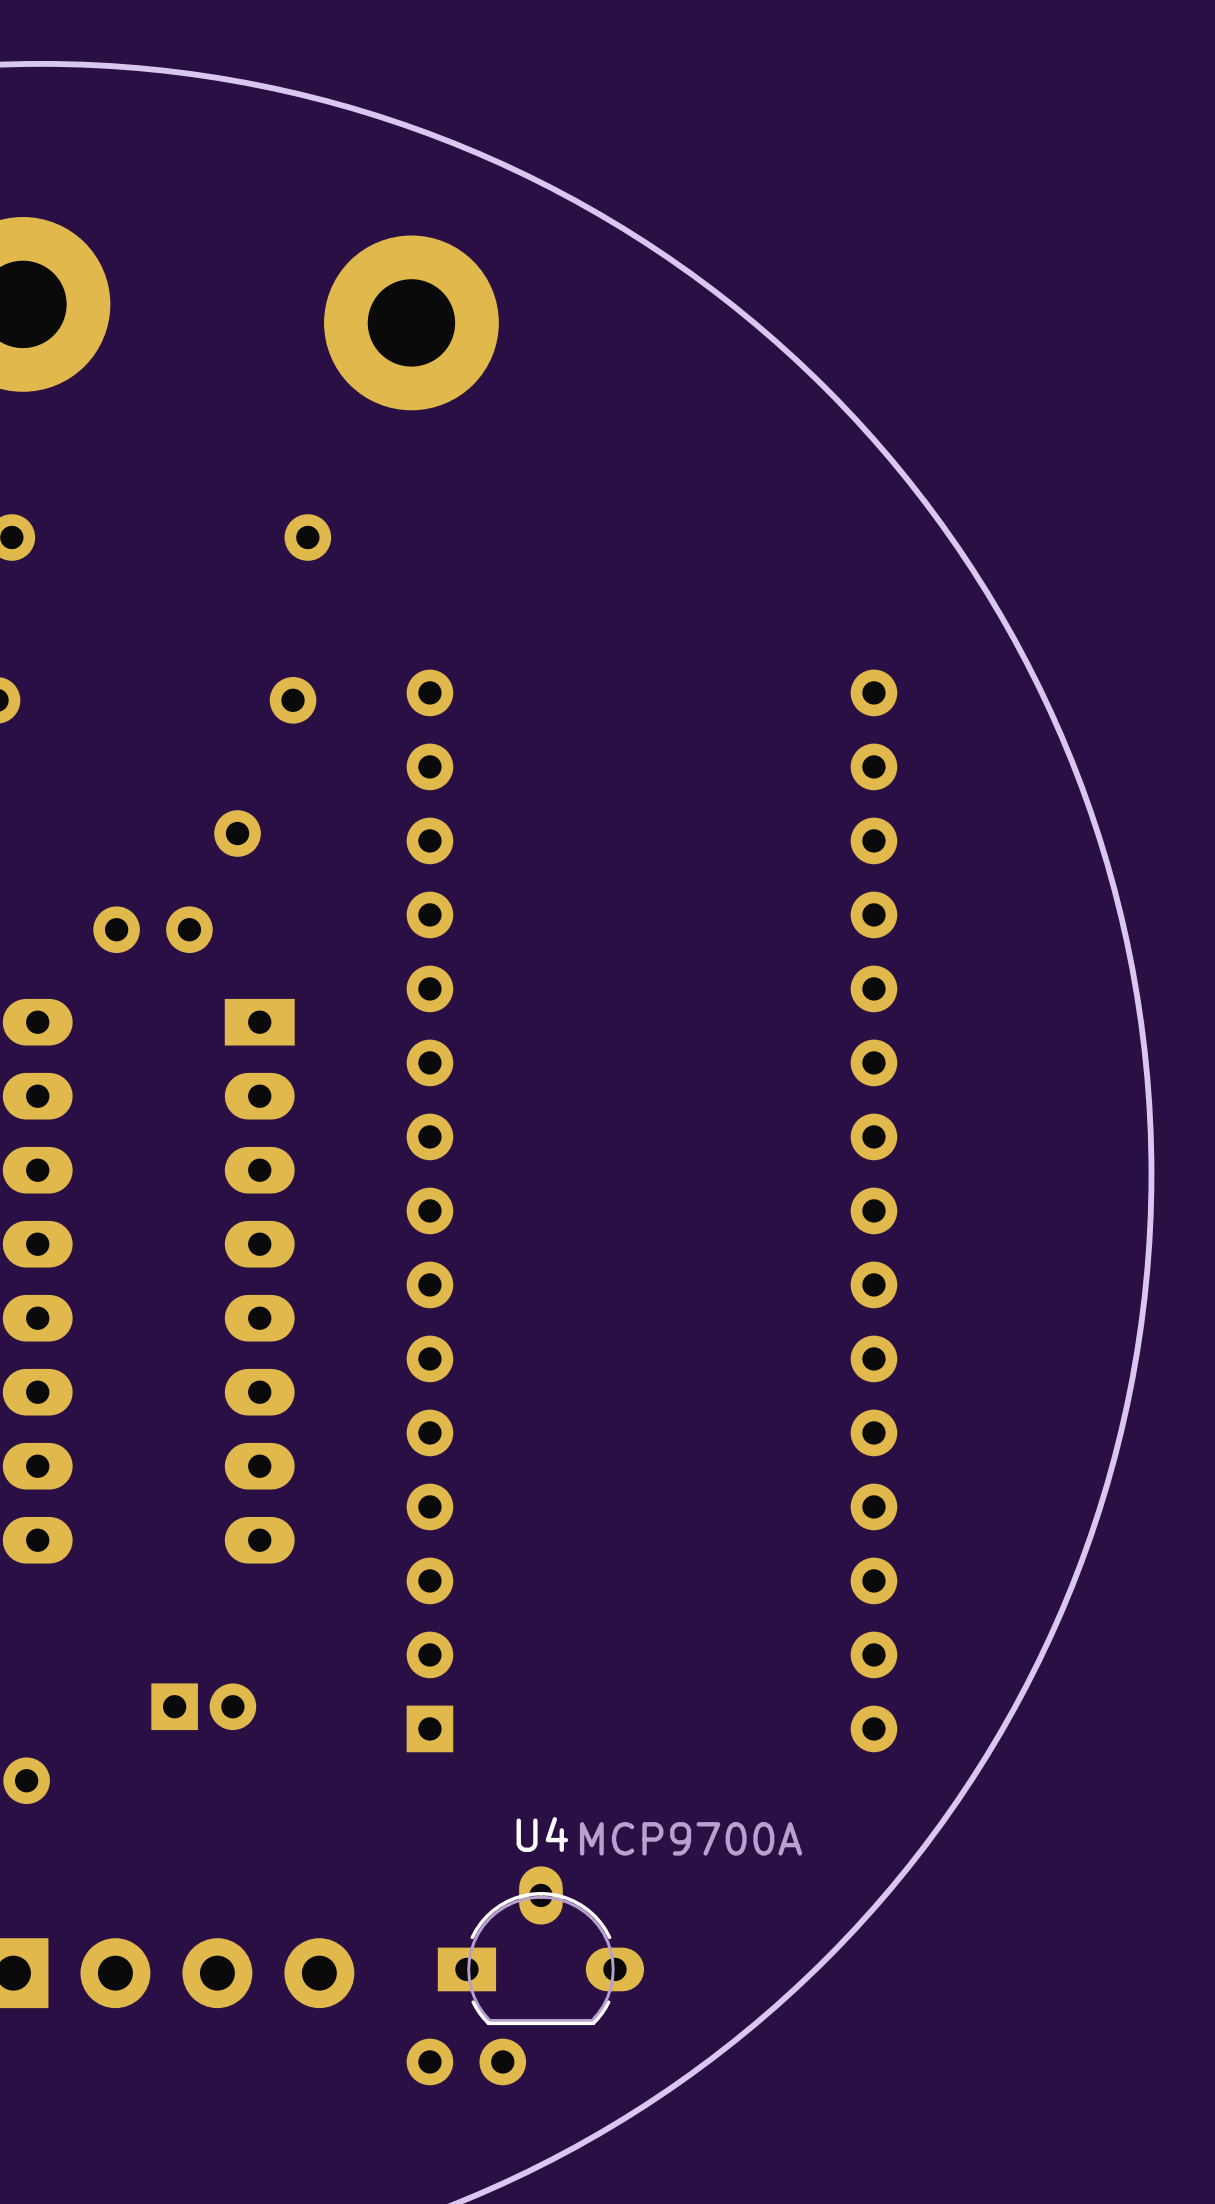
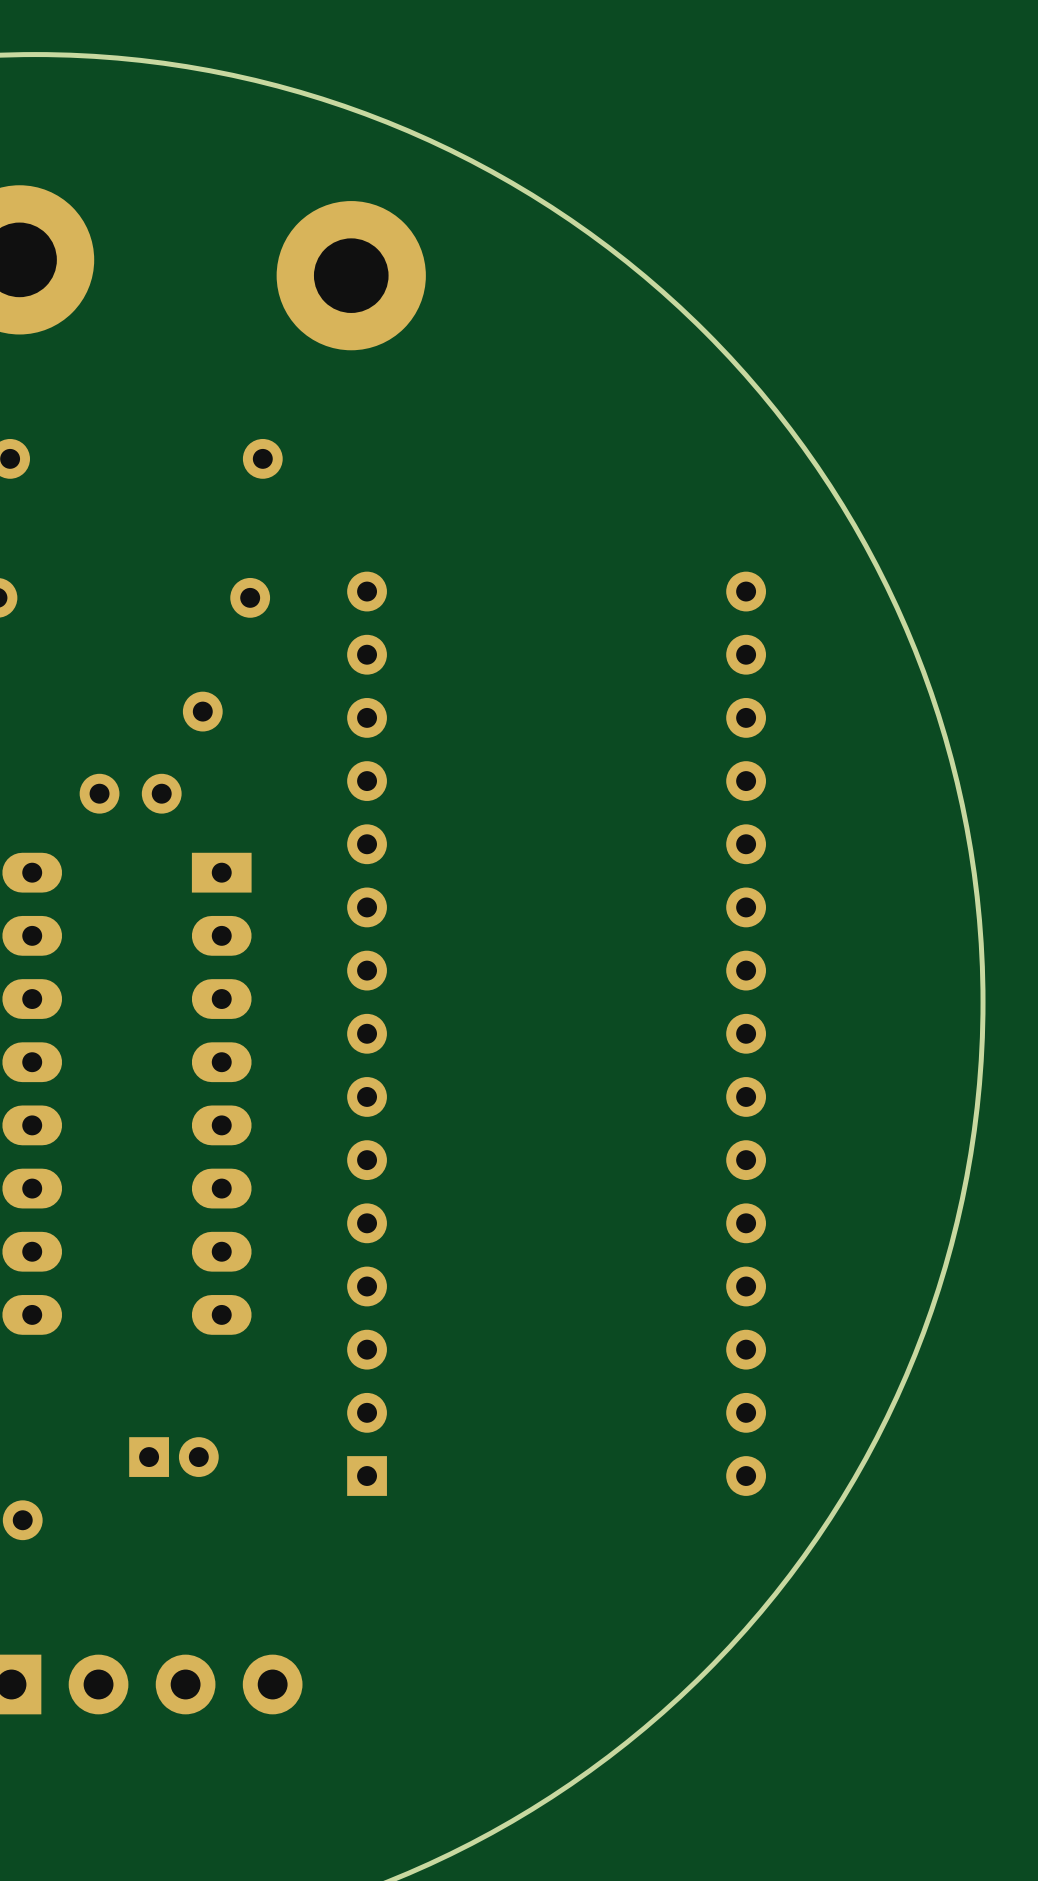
U4: MCP9700A (540, 1945) -> none
part: (466, 2061) -> none

